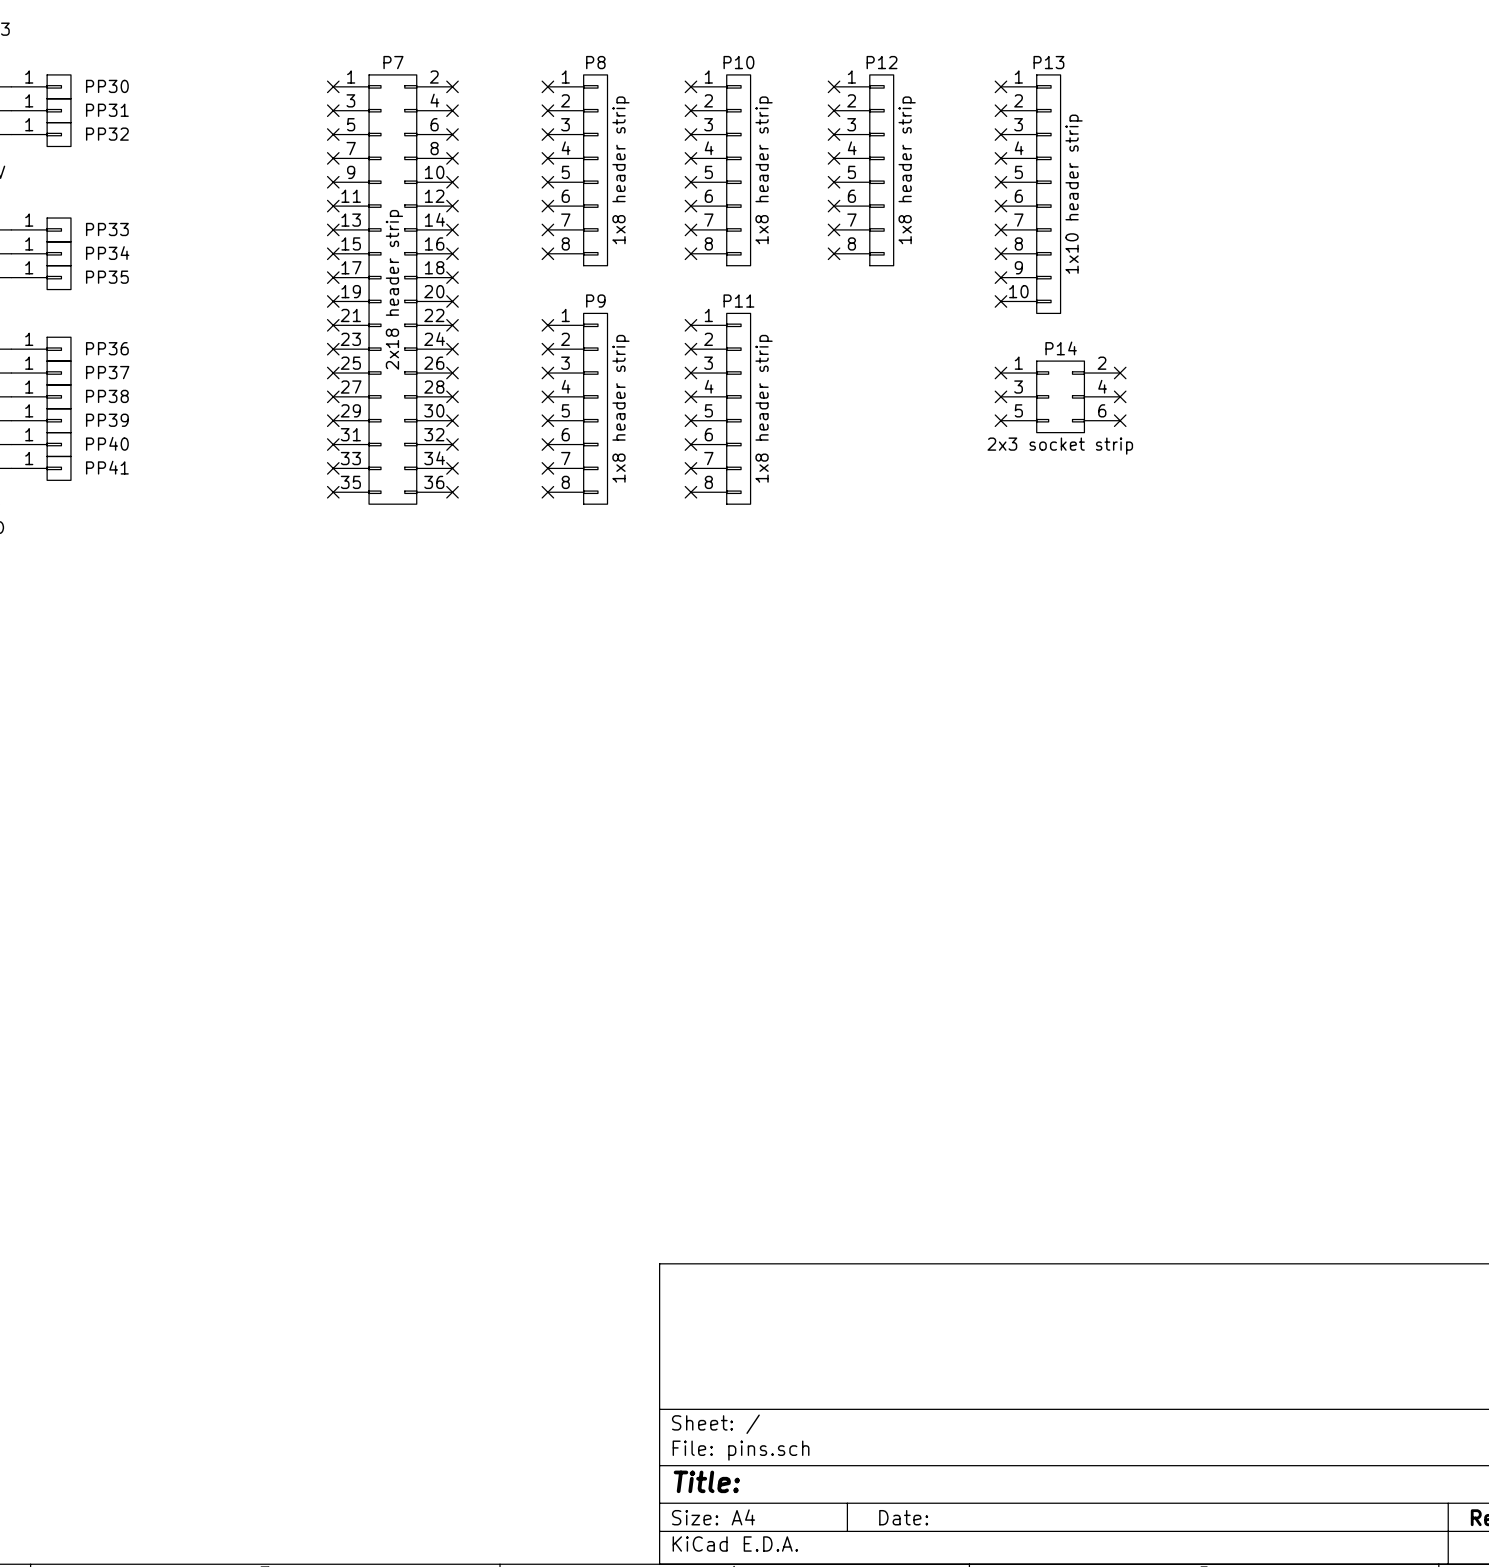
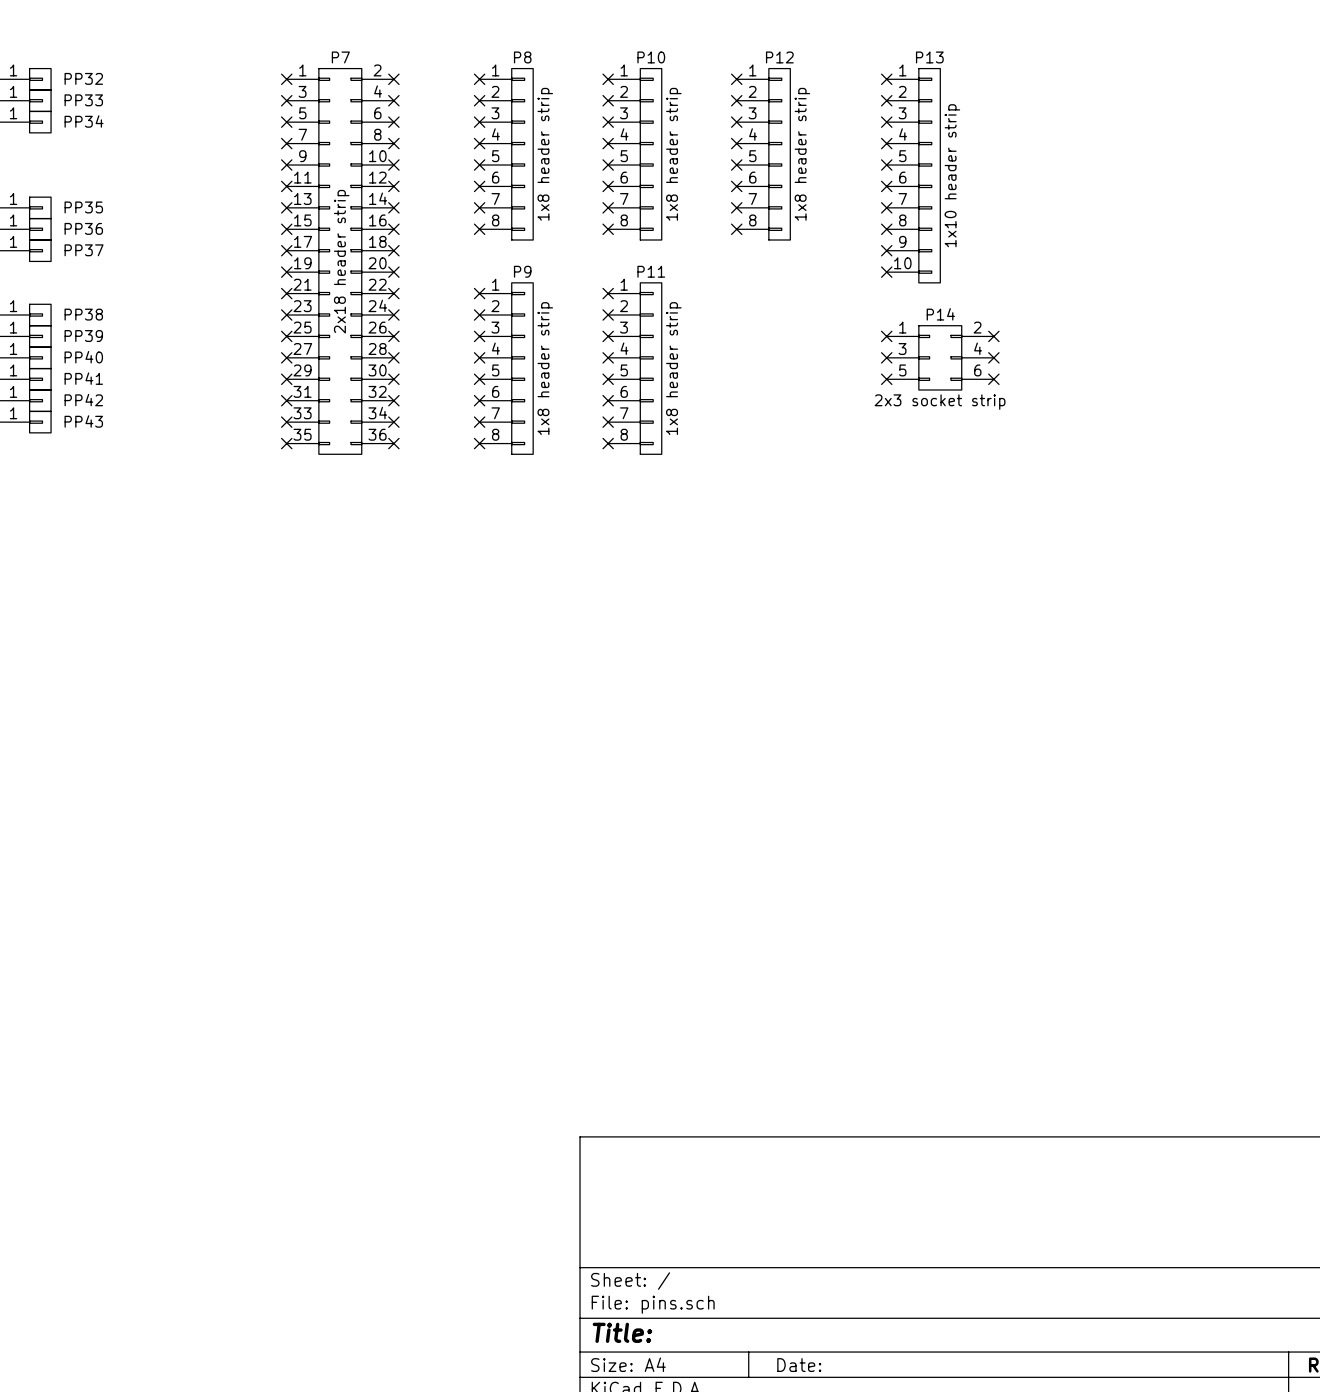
PP30 name: PP30 (107, 86) -> PP32 (83, 78)
PP31 name: PP31 (107, 110) -> PP33 (83, 100)
PP32 name: PP32 (107, 134) -> PP34 (84, 121)
PP33 name: PP33 (107, 229) -> PP35 (83, 207)
PP34 name: PP34 (107, 253) -> PP36 (83, 228)
PP35 name: PP35 (107, 277) -> PP37 (84, 250)
PP36 name: PP36 (107, 348) -> PP38 (83, 314)
PP37 name: PP37 (107, 372) -> PP39 (83, 336)
PP38 name: PP38 (107, 396) -> PP40 (83, 357)
PP39 name: PP39 (107, 420) -> PP41 (83, 378)
PP40 name: PP40 (107, 443) -> PP42 (83, 400)
PP41 name: PP41 (107, 467) -> PP43 (83, 421)

